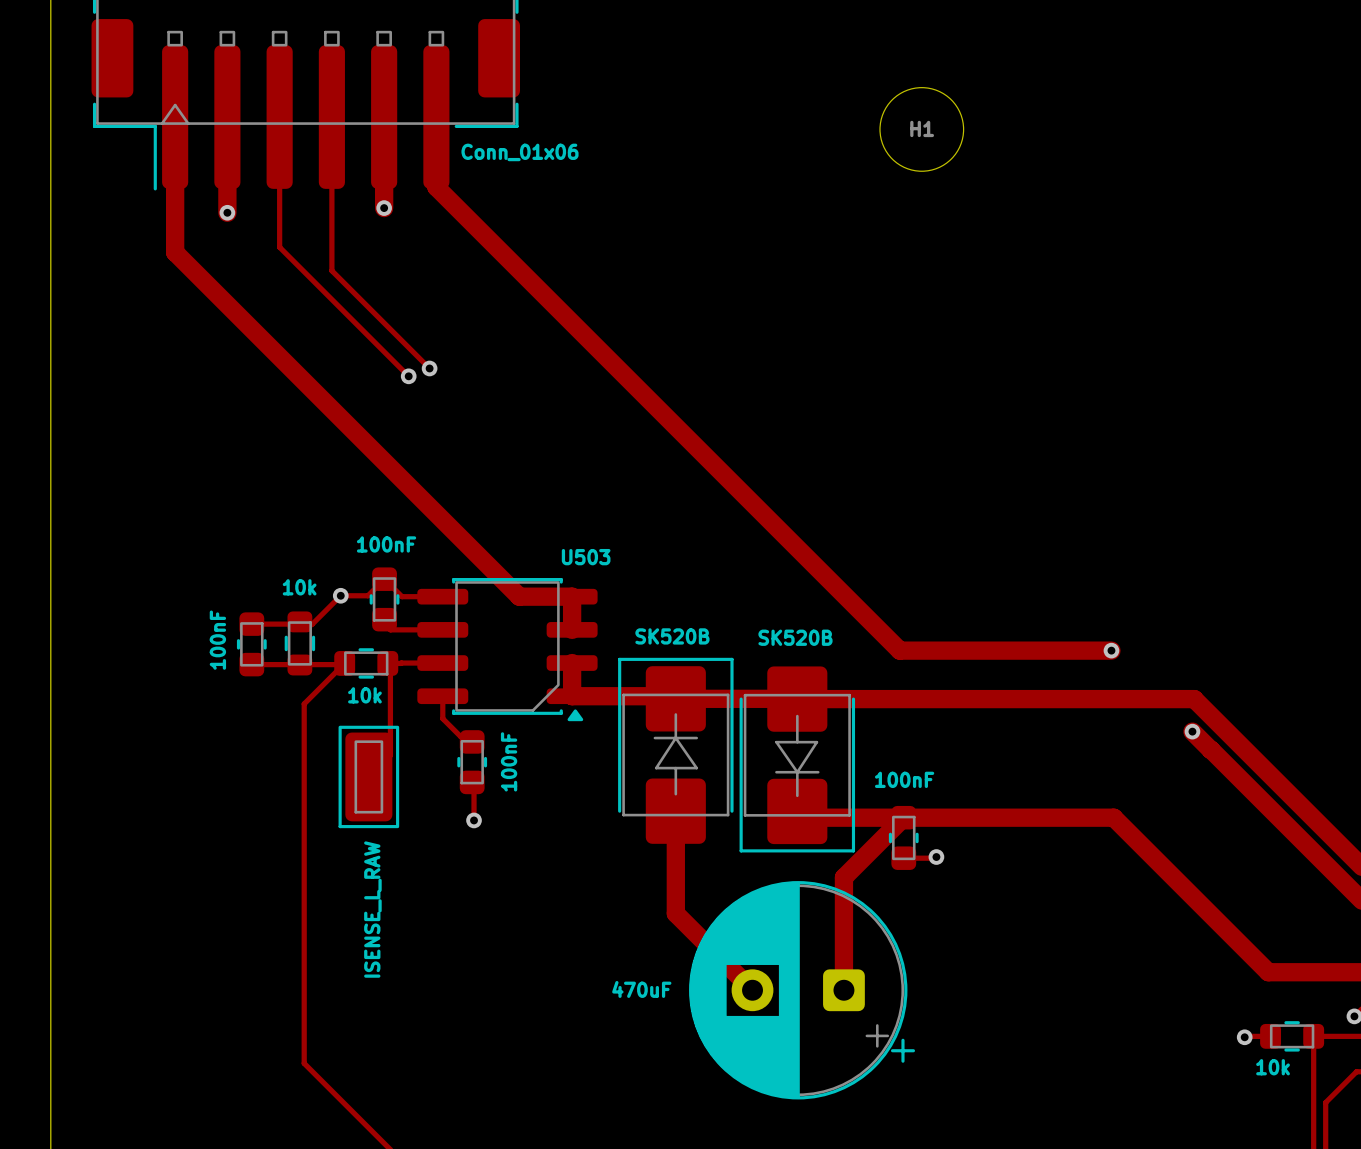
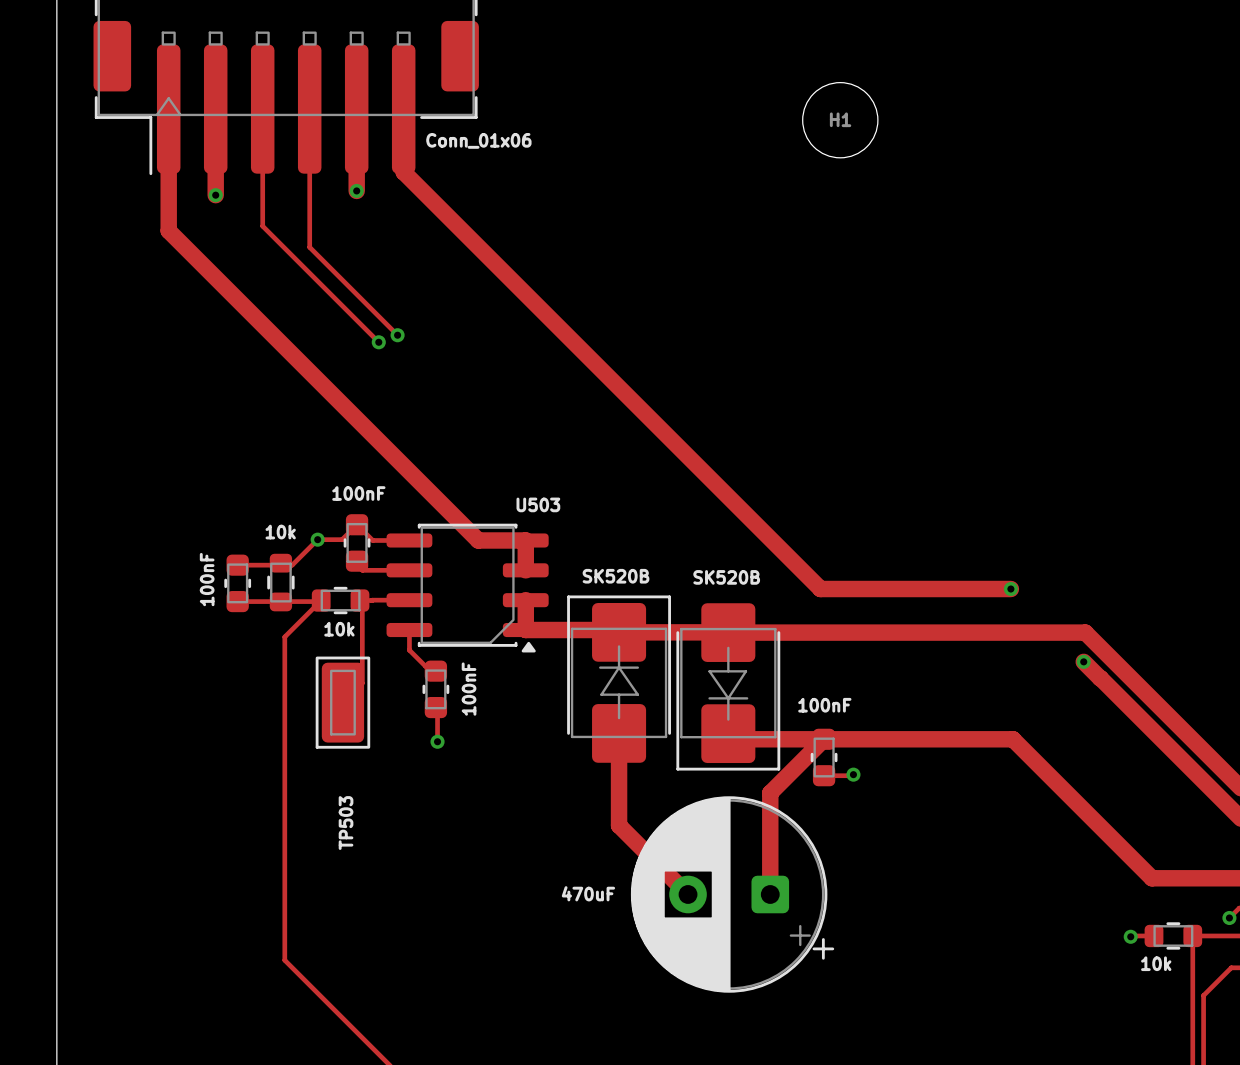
ISENSE_L_RAW name: ISENSE_L_RAW (372, 909) -> TP503 (346, 823)

